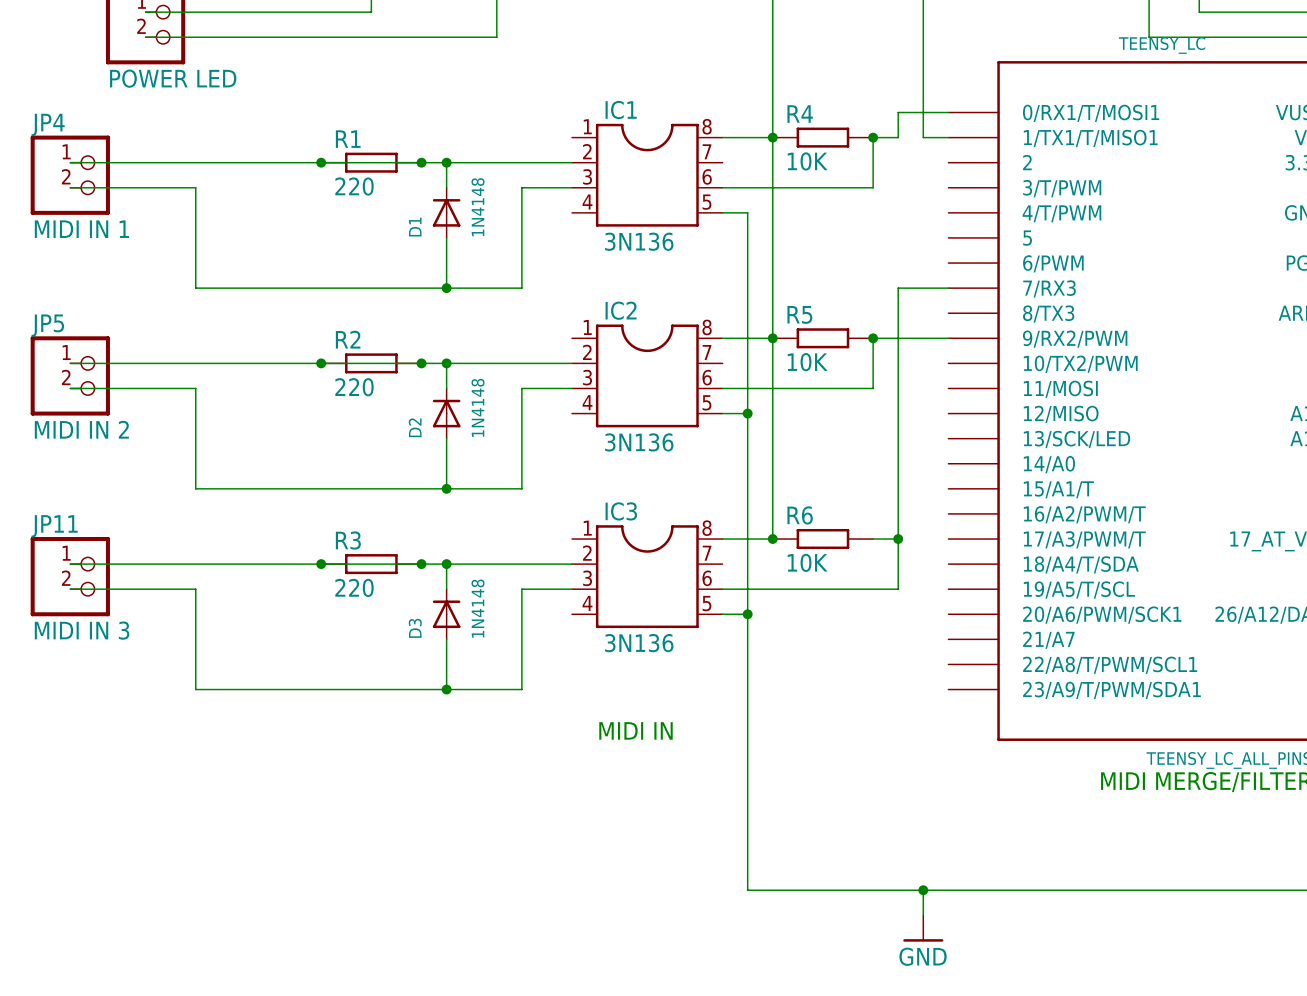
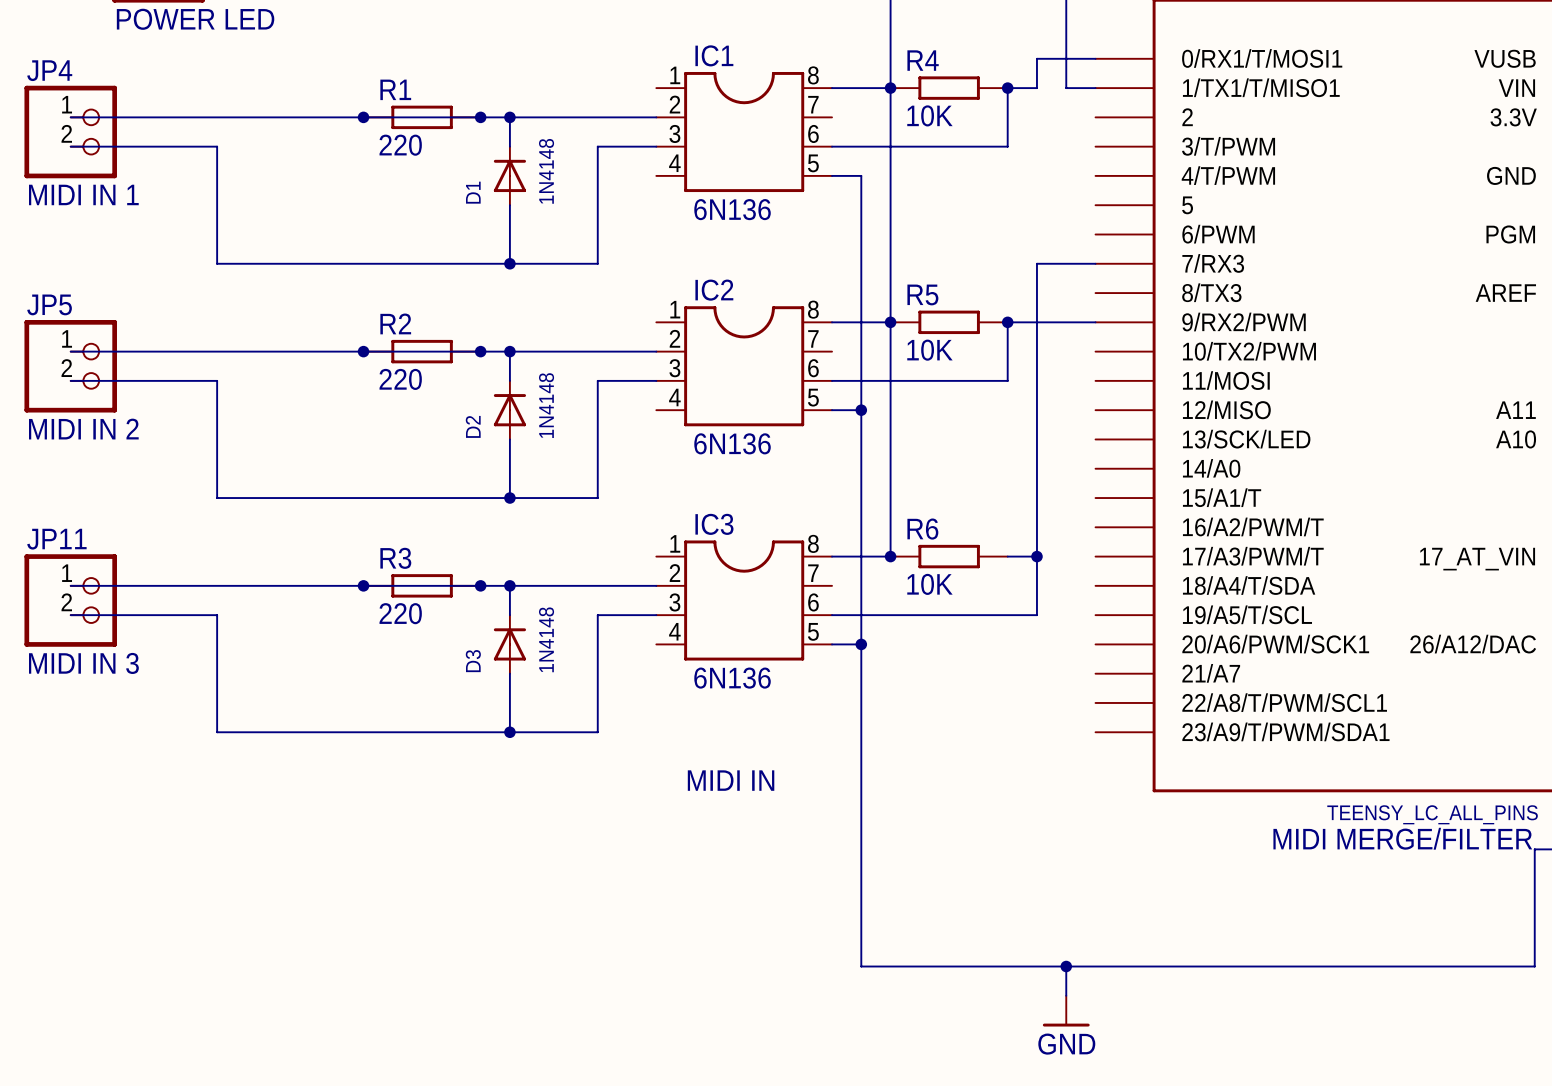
IC1 value: 3N136 (639, 241) -> 6N136 (732, 209)
IC2 value: 3N136 (639, 442) -> 6N136 (732, 443)
IC3 value: 3N136 (639, 643) -> 6N136 (732, 678)

